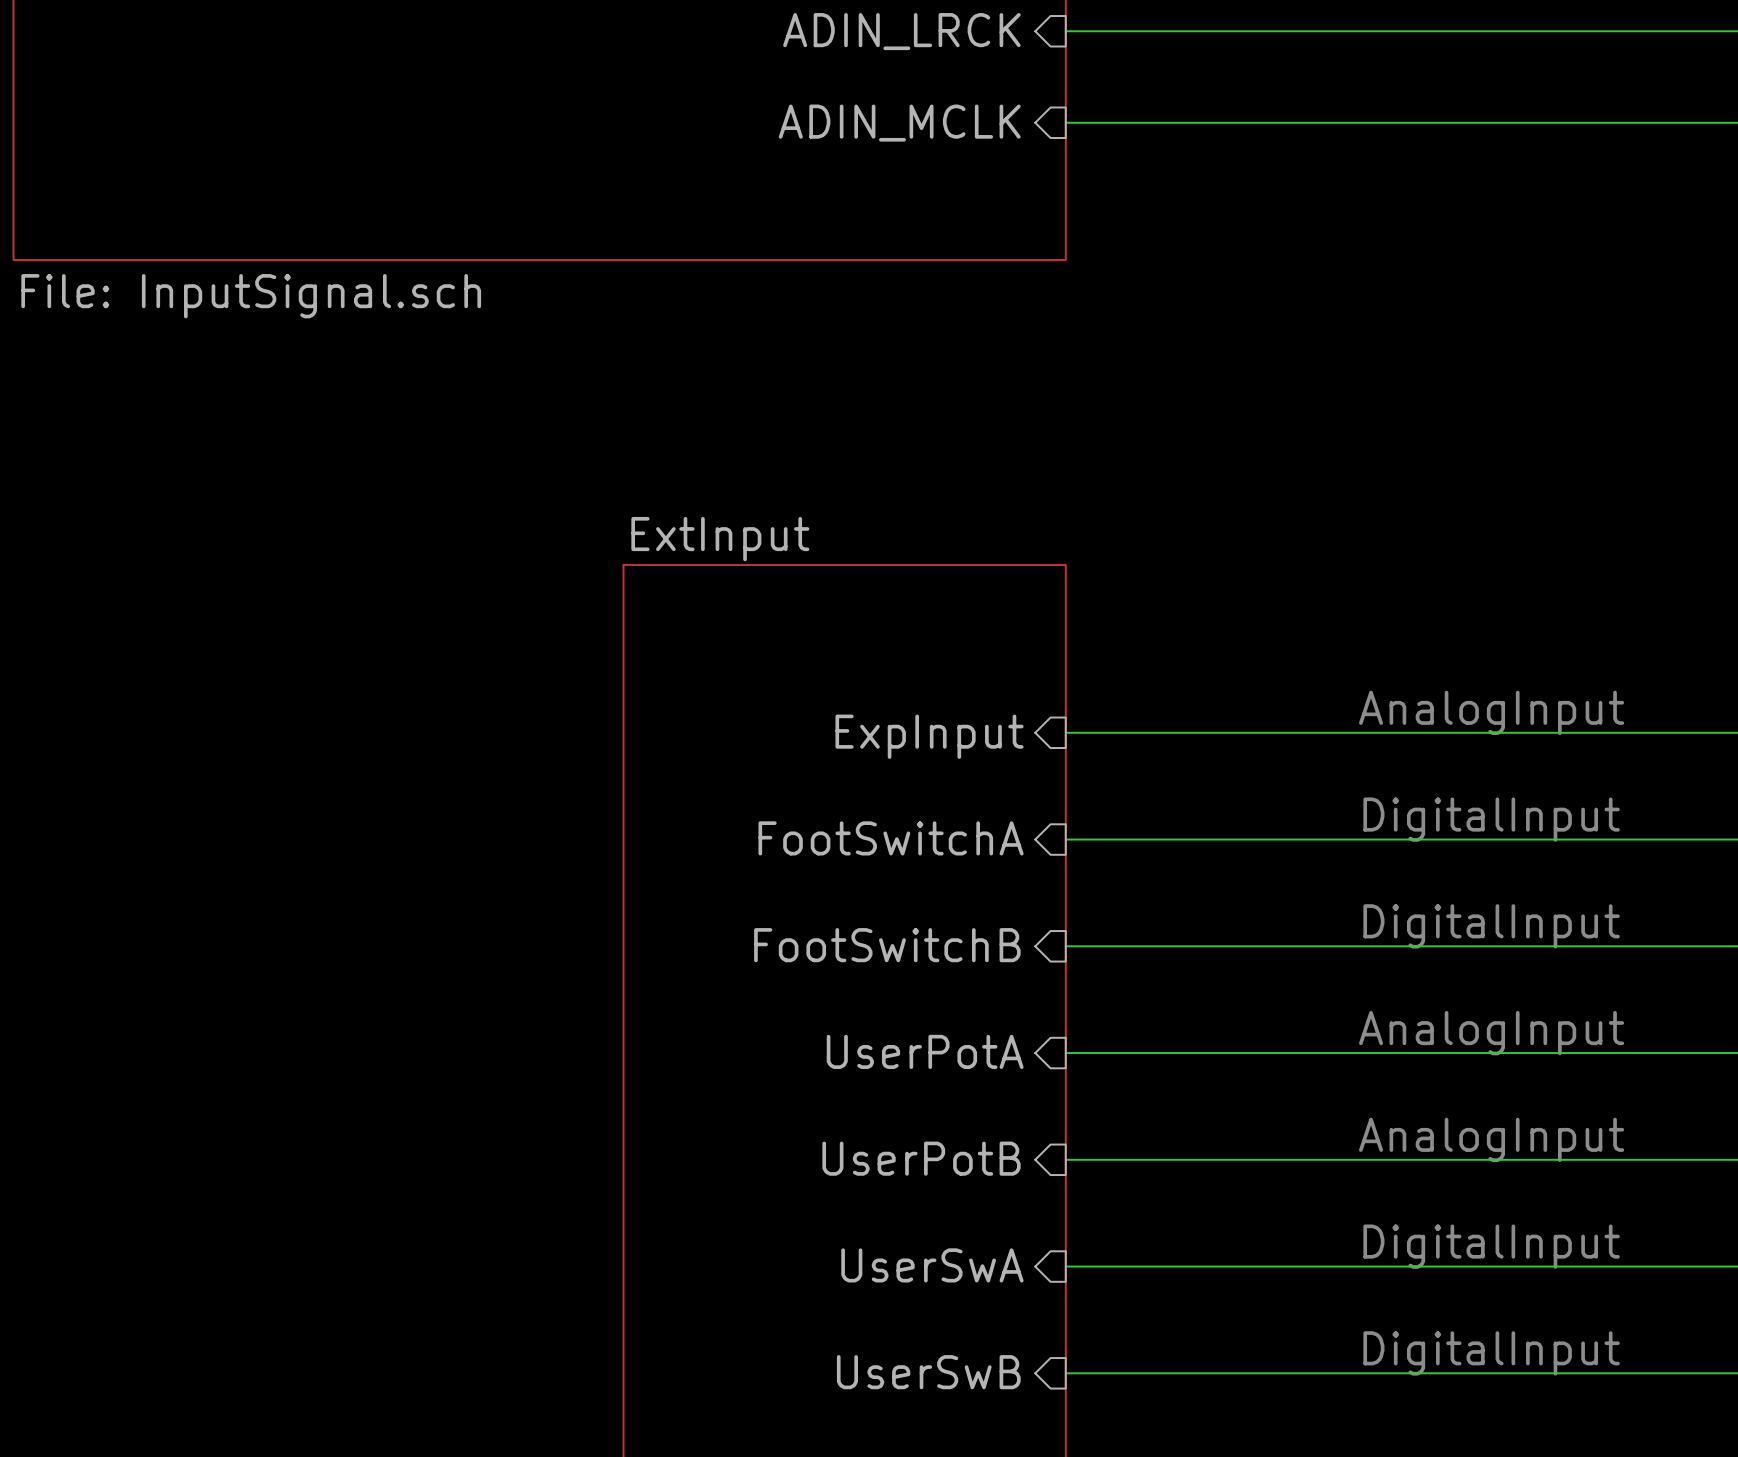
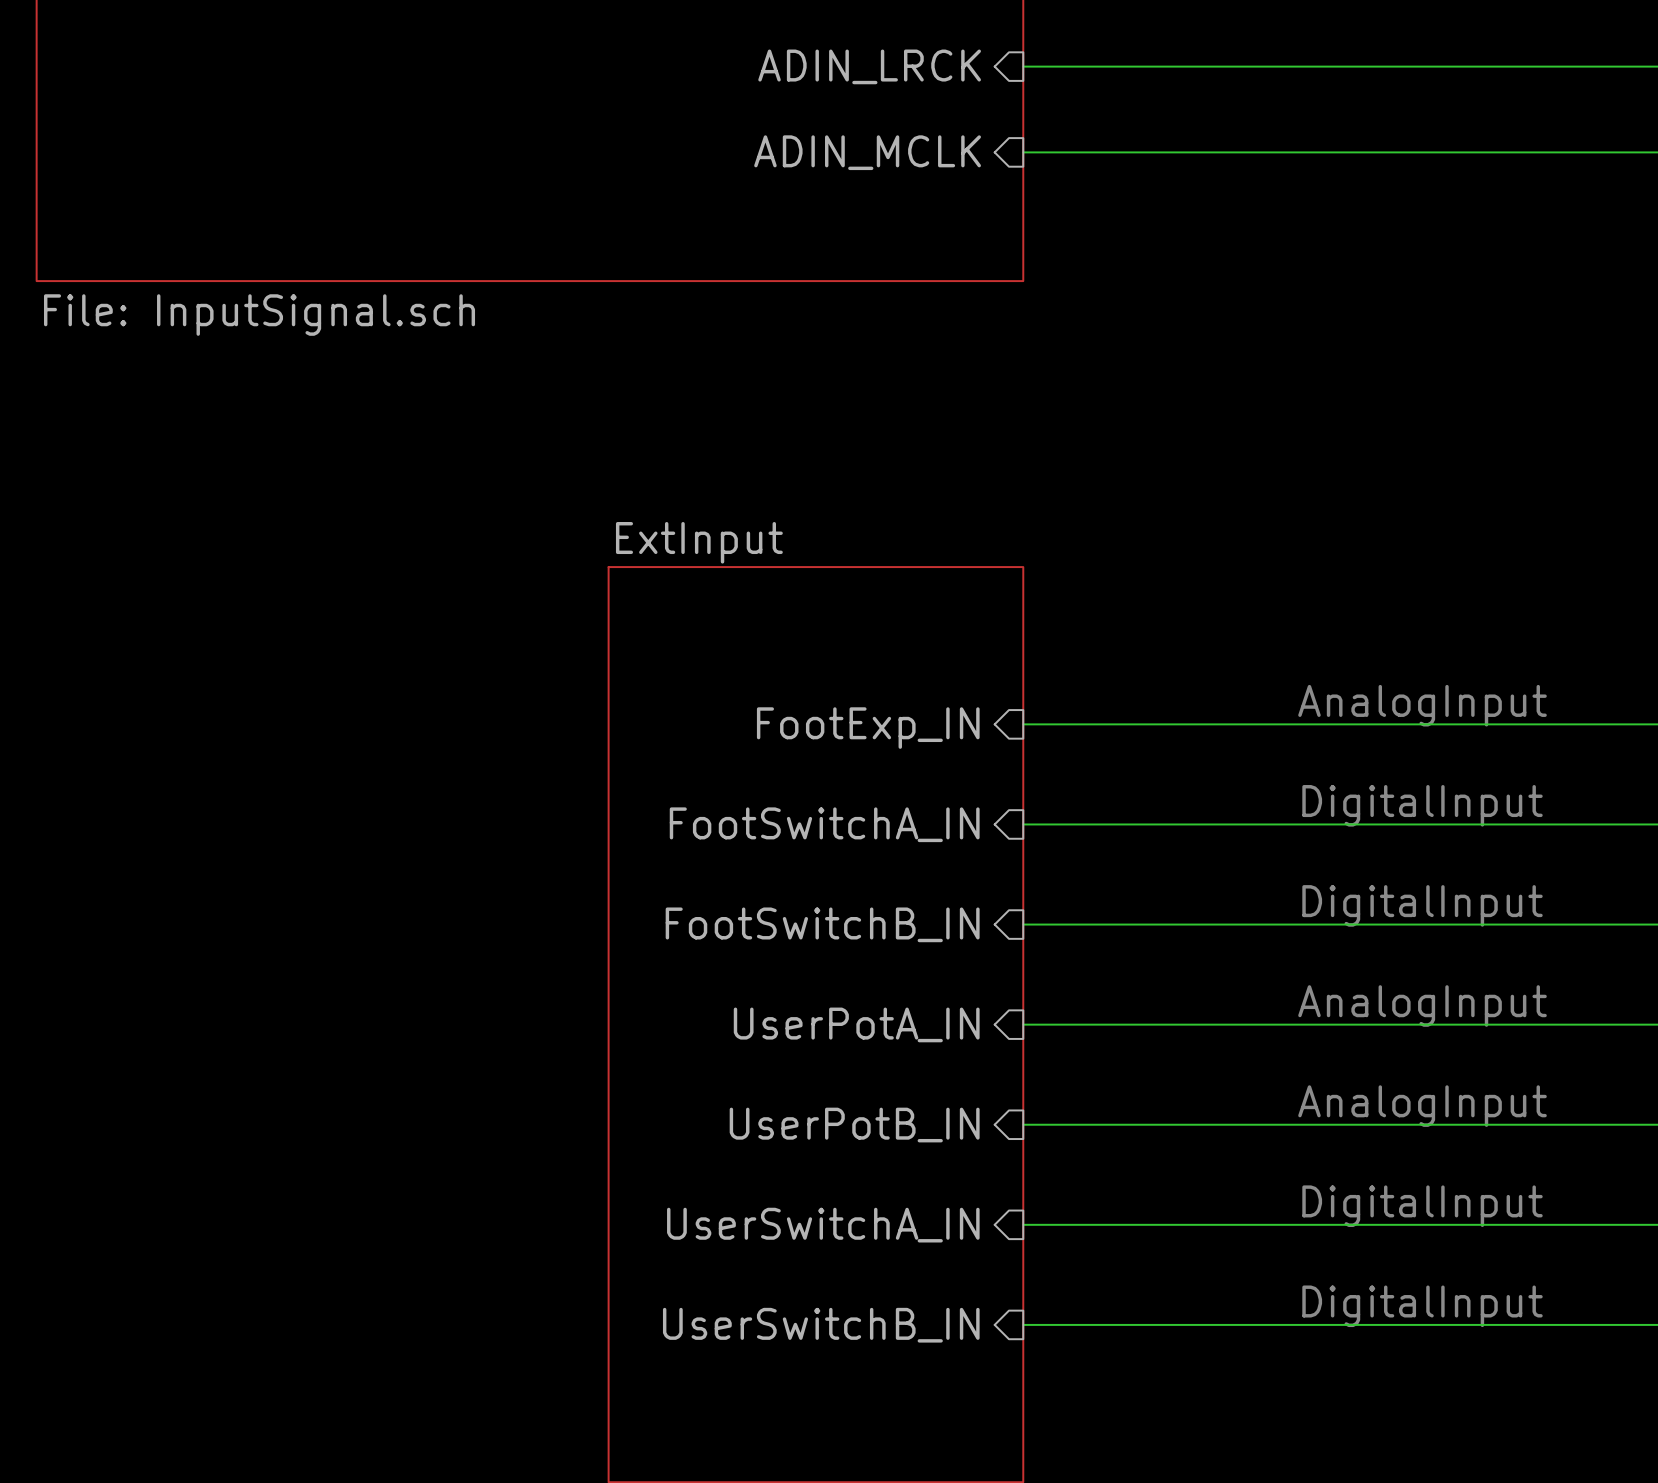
sheet pin: ExpInput (929, 736) -> FootExp_IN (868, 728)
sheet pin: FootSwitchA (891, 838) -> FootSwitchA_IN (824, 824)
sheet pin: FootSwitchB (887, 945) -> FootSwitchB_IN (822, 924)
sheet pin: UserPotA (925, 1051) -> UserPotA_IN (856, 1024)
sheet pin: UserPotB (921, 1158) -> UserPotB_IN (854, 1125)
sheet pin: UserSwA (932, 1265) -> UserSwitchA_IN (823, 1225)
sheet pin: UserSwB (928, 1372) -> UserSwitchB_IN (821, 1325)

